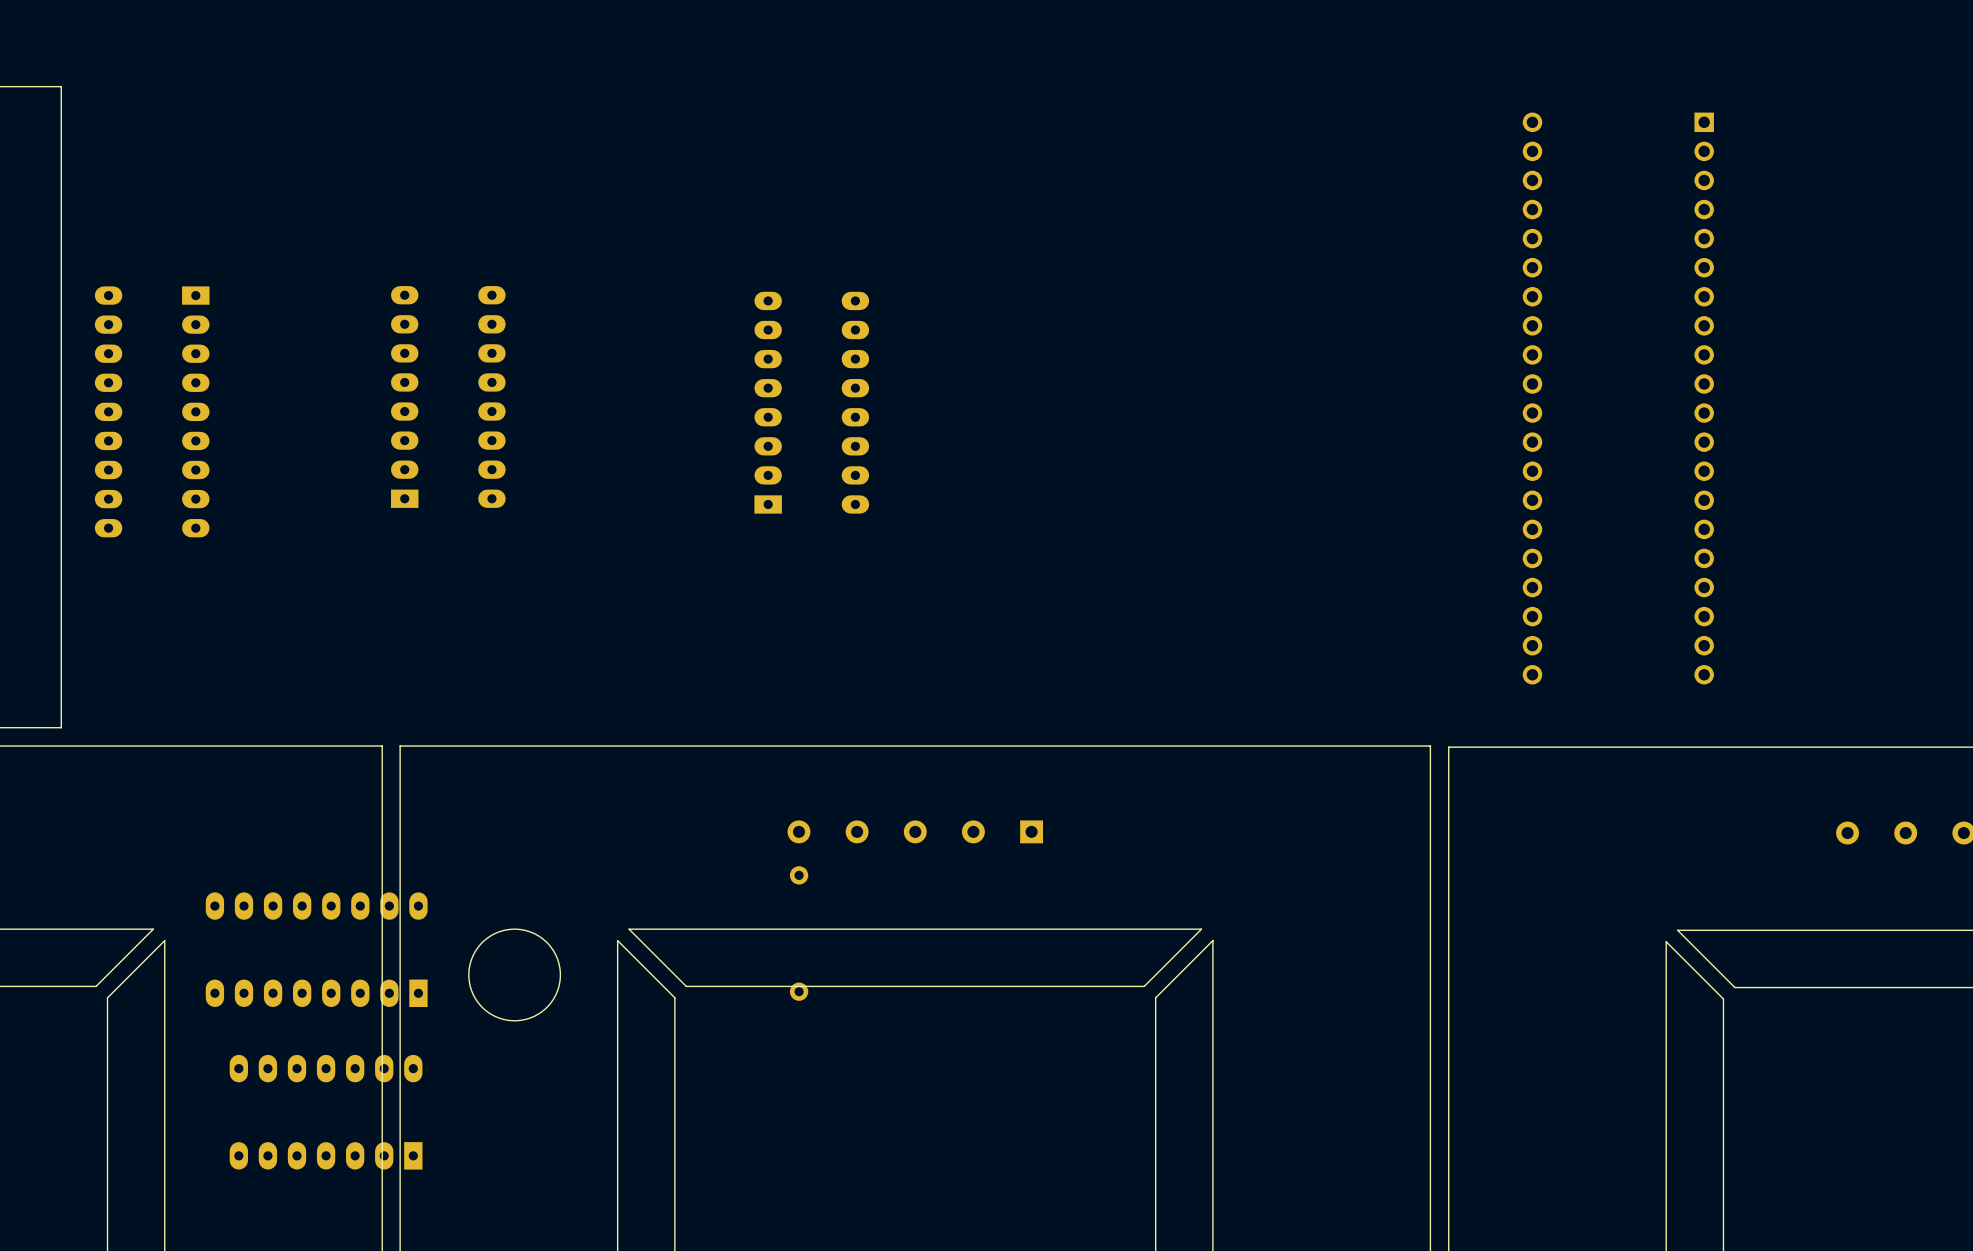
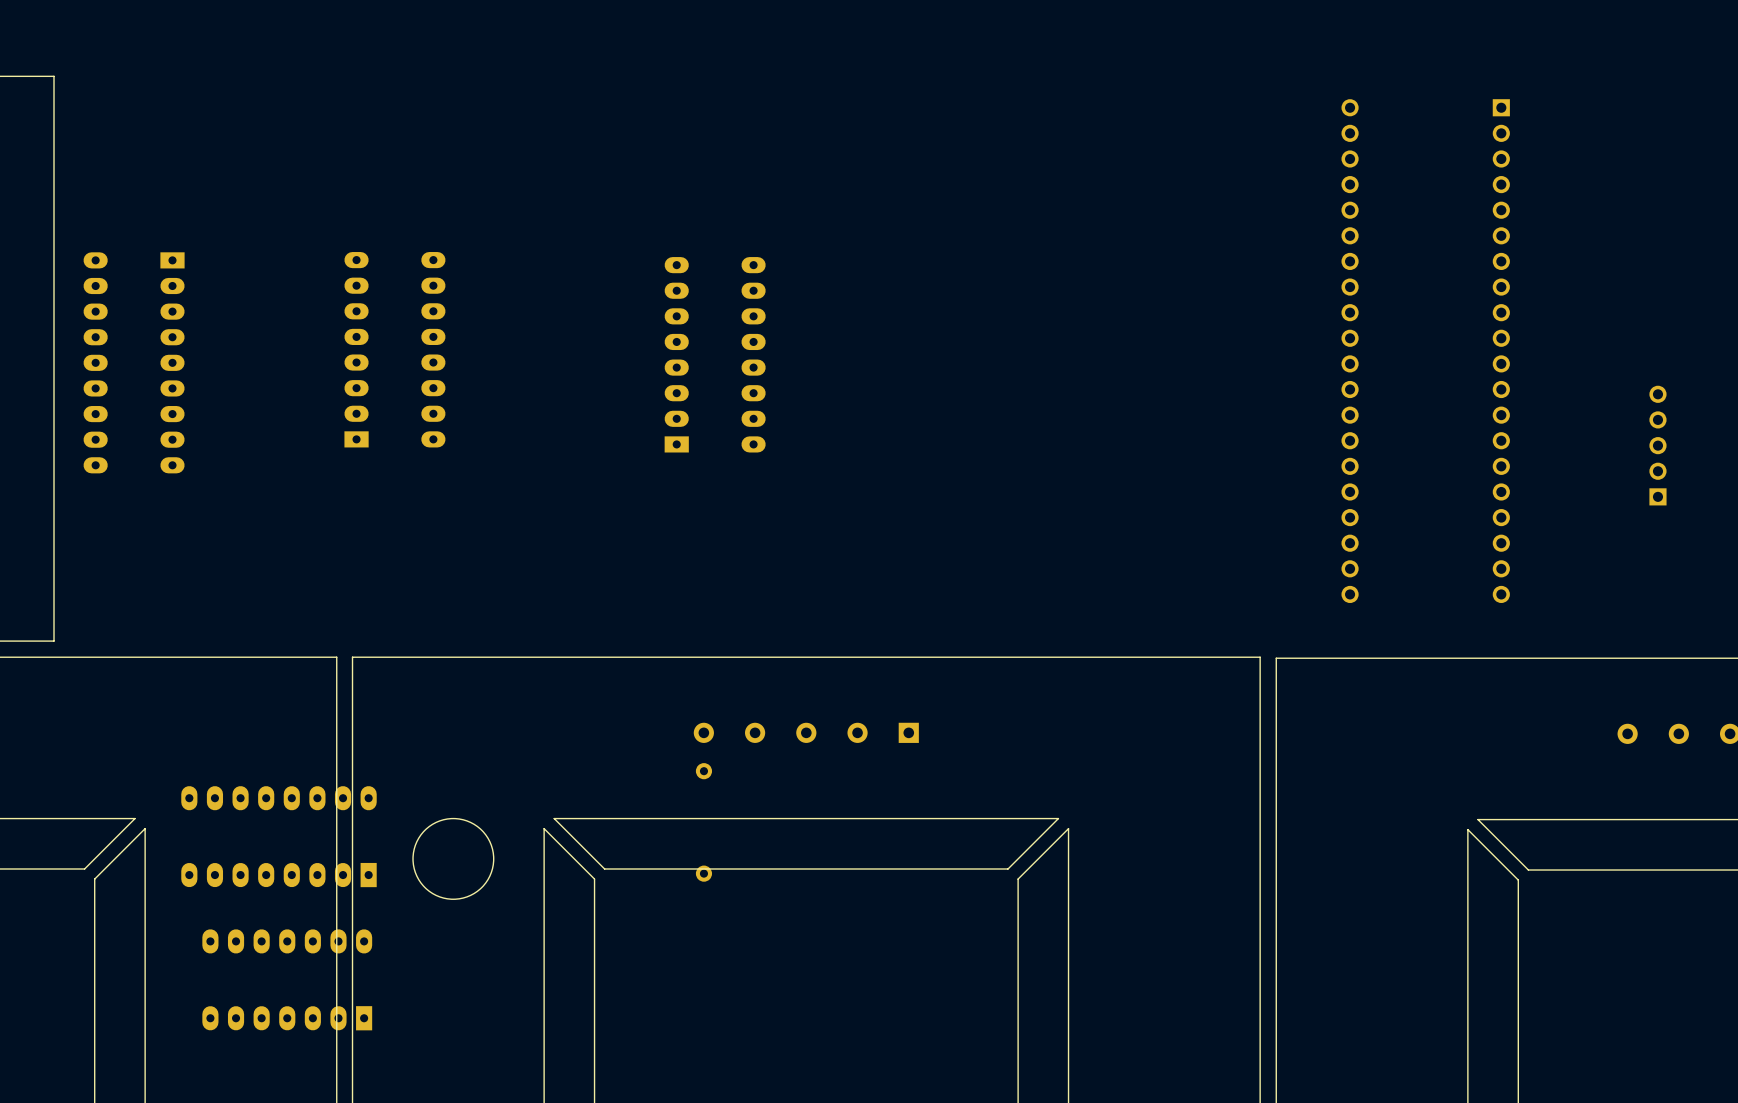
part: none -> (1657, 445)

